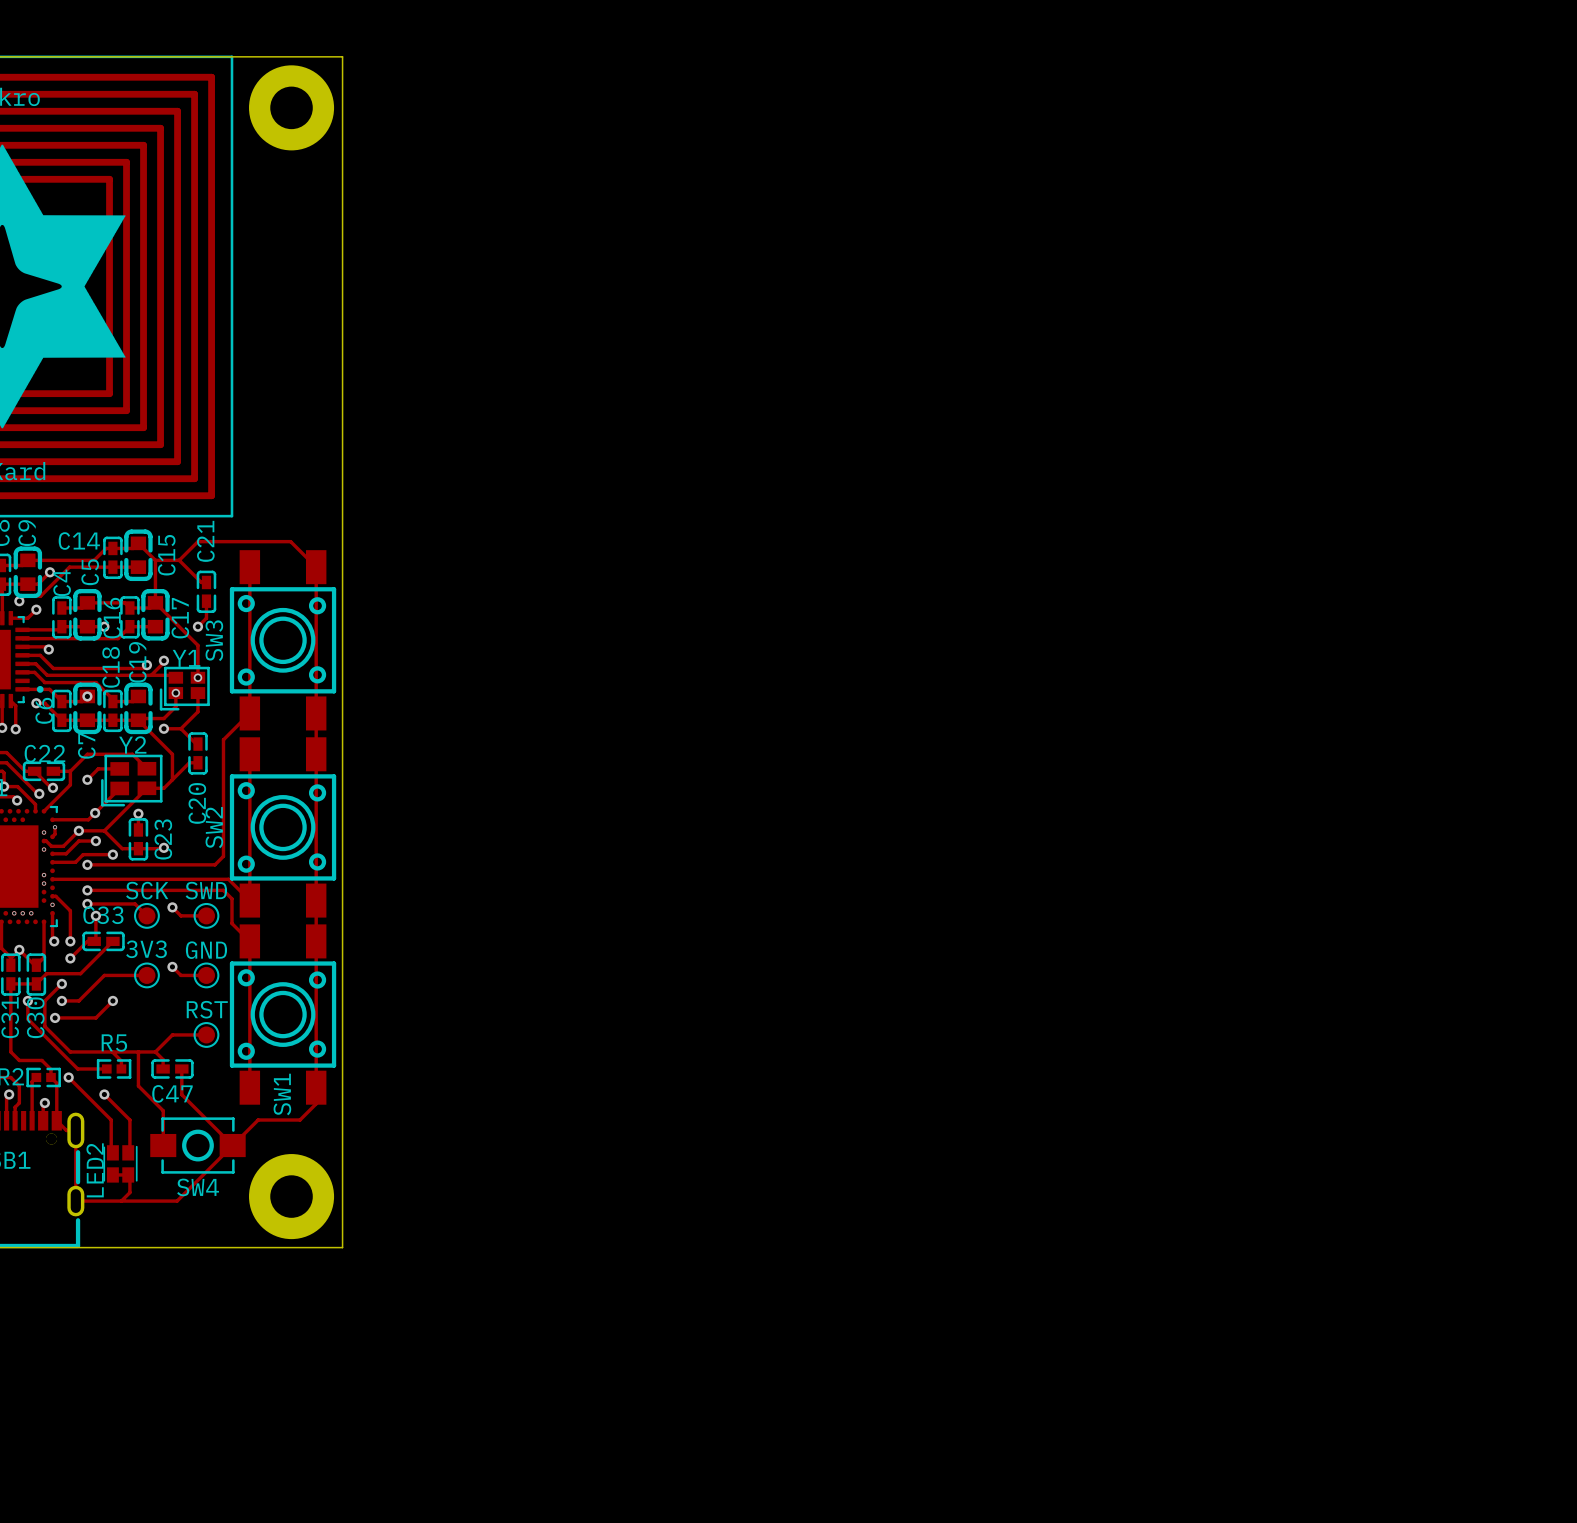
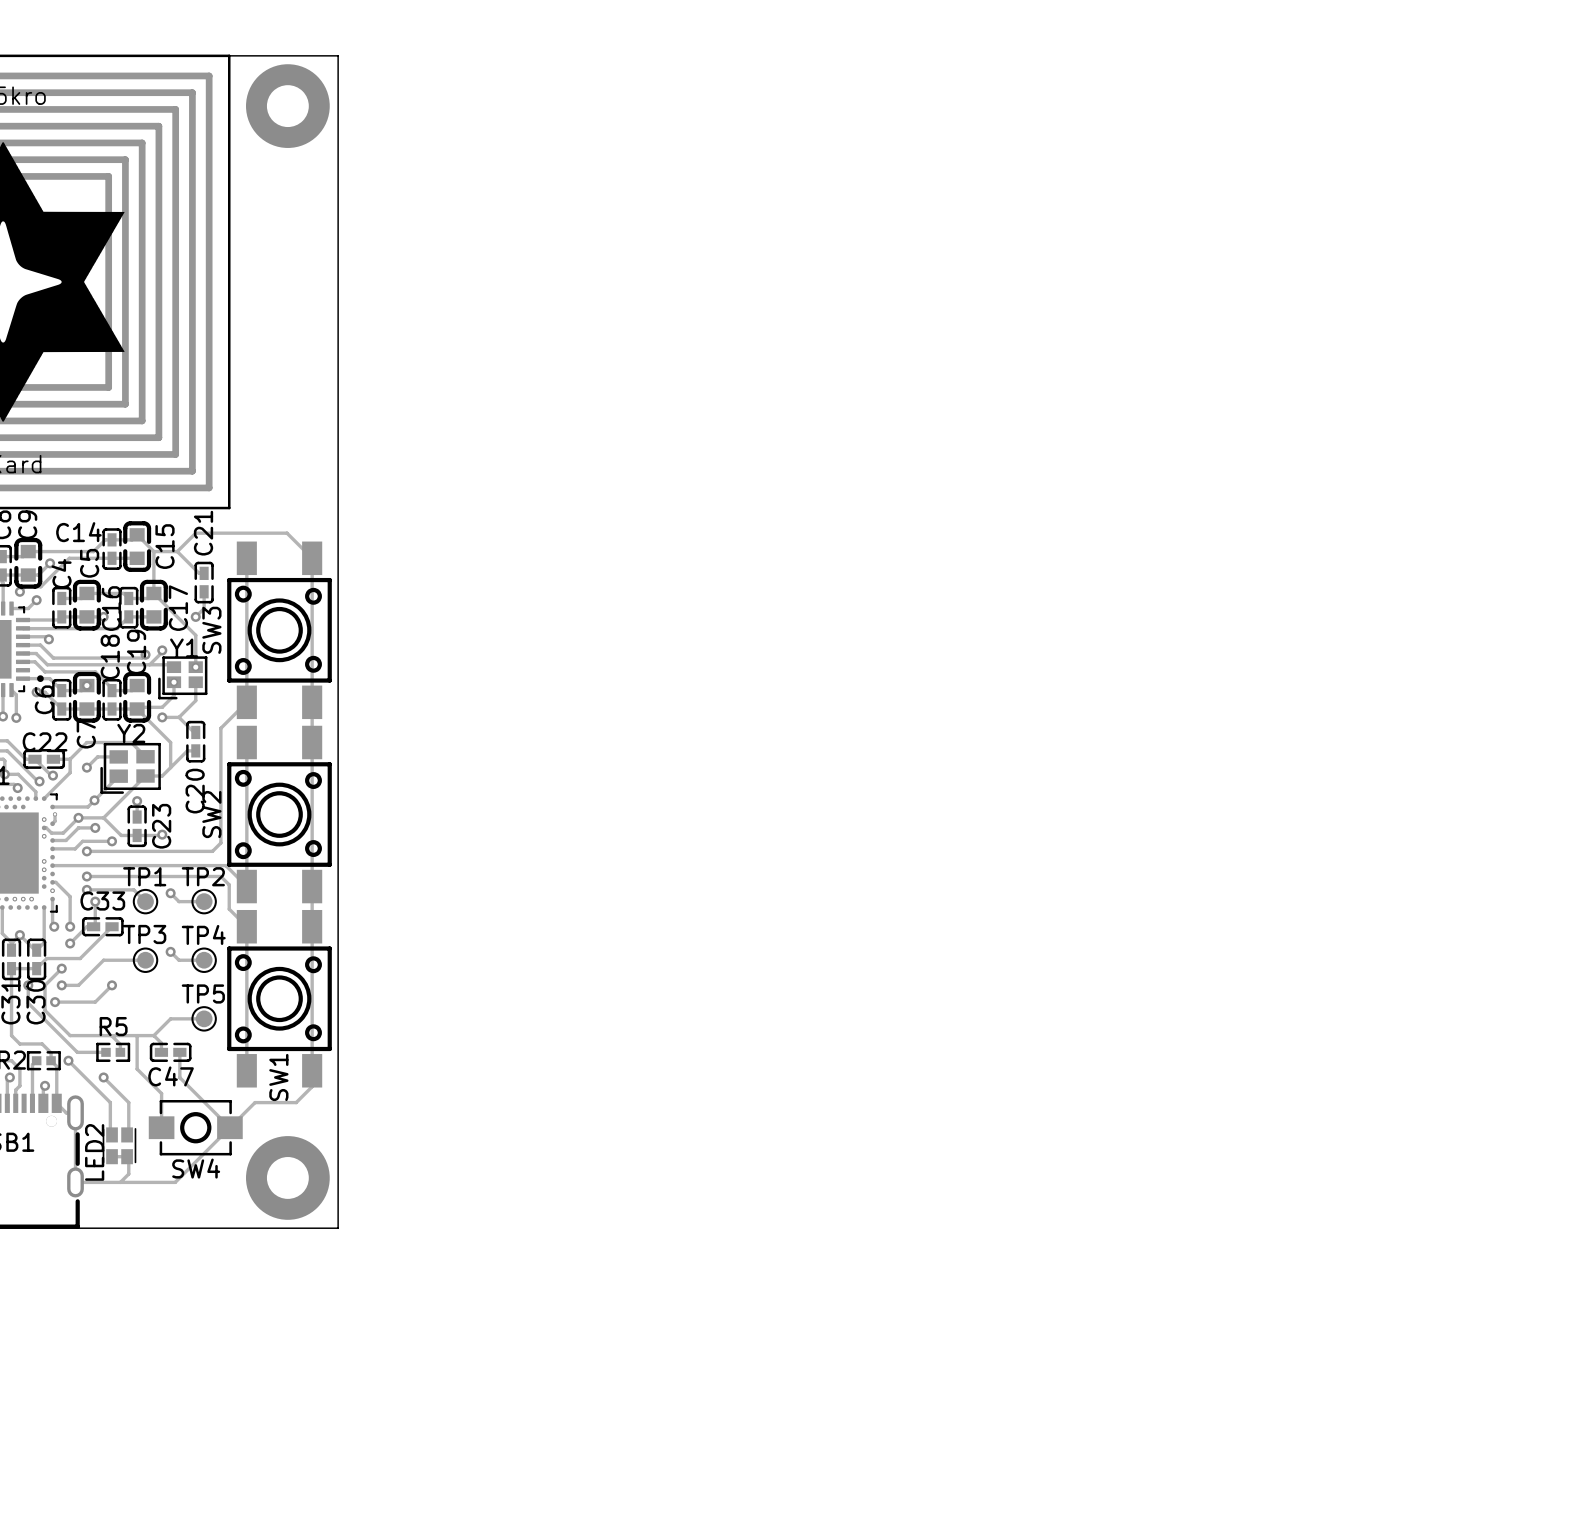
SCK name: SCK (147, 890) -> TP1 (144, 876)
SWD name: SWD (206, 890) -> TP2 (203, 876)
3V3 name: 3V3 (146, 949) -> TP3 (144, 934)
GND name: GND (206, 950) -> TP4 (203, 934)
RST name: RST (207, 1009) -> TP5 (203, 993)

